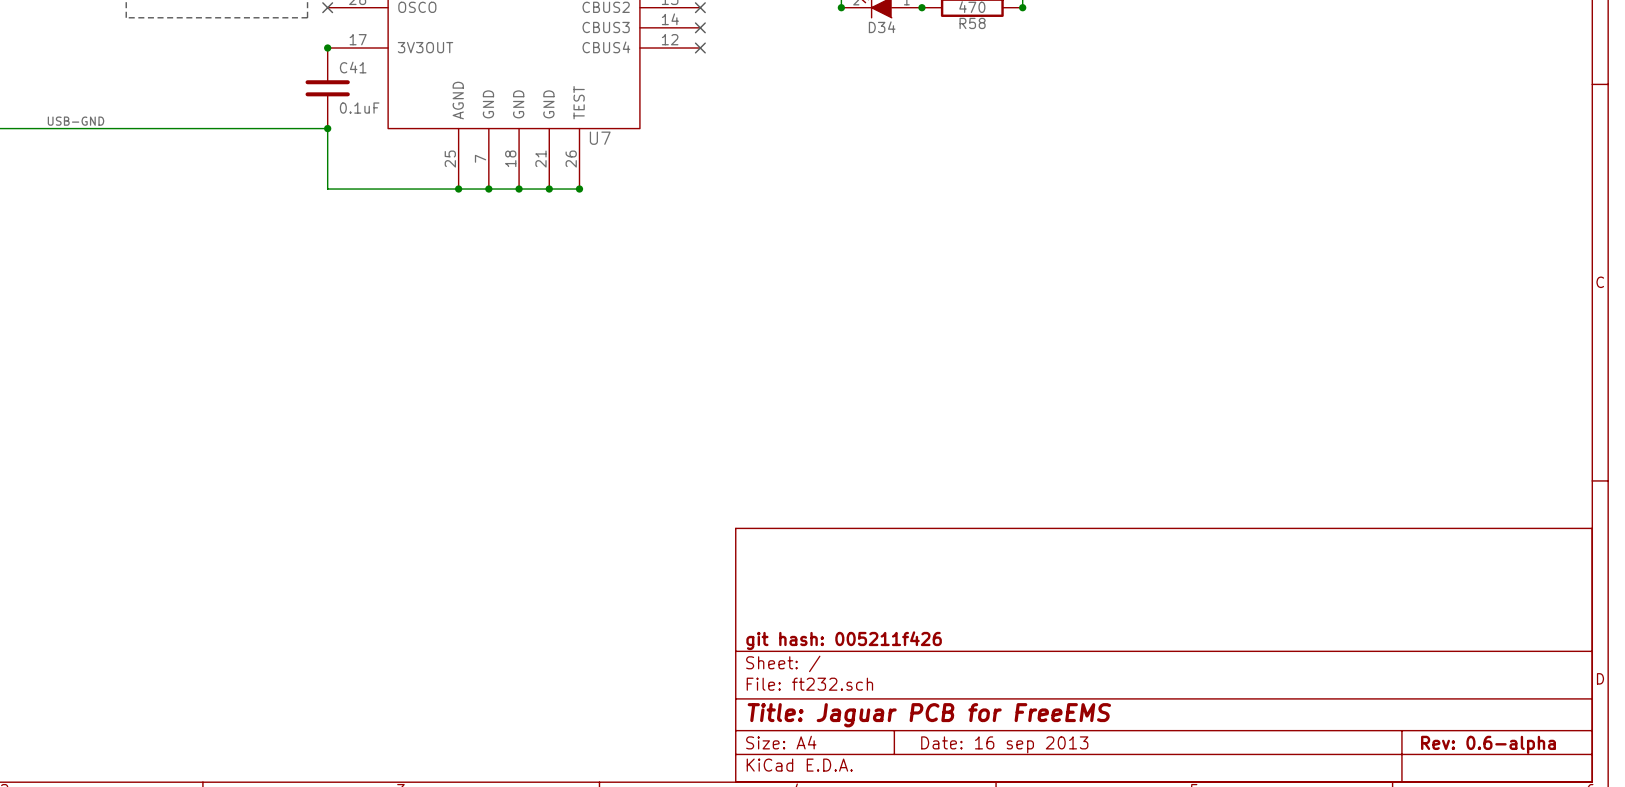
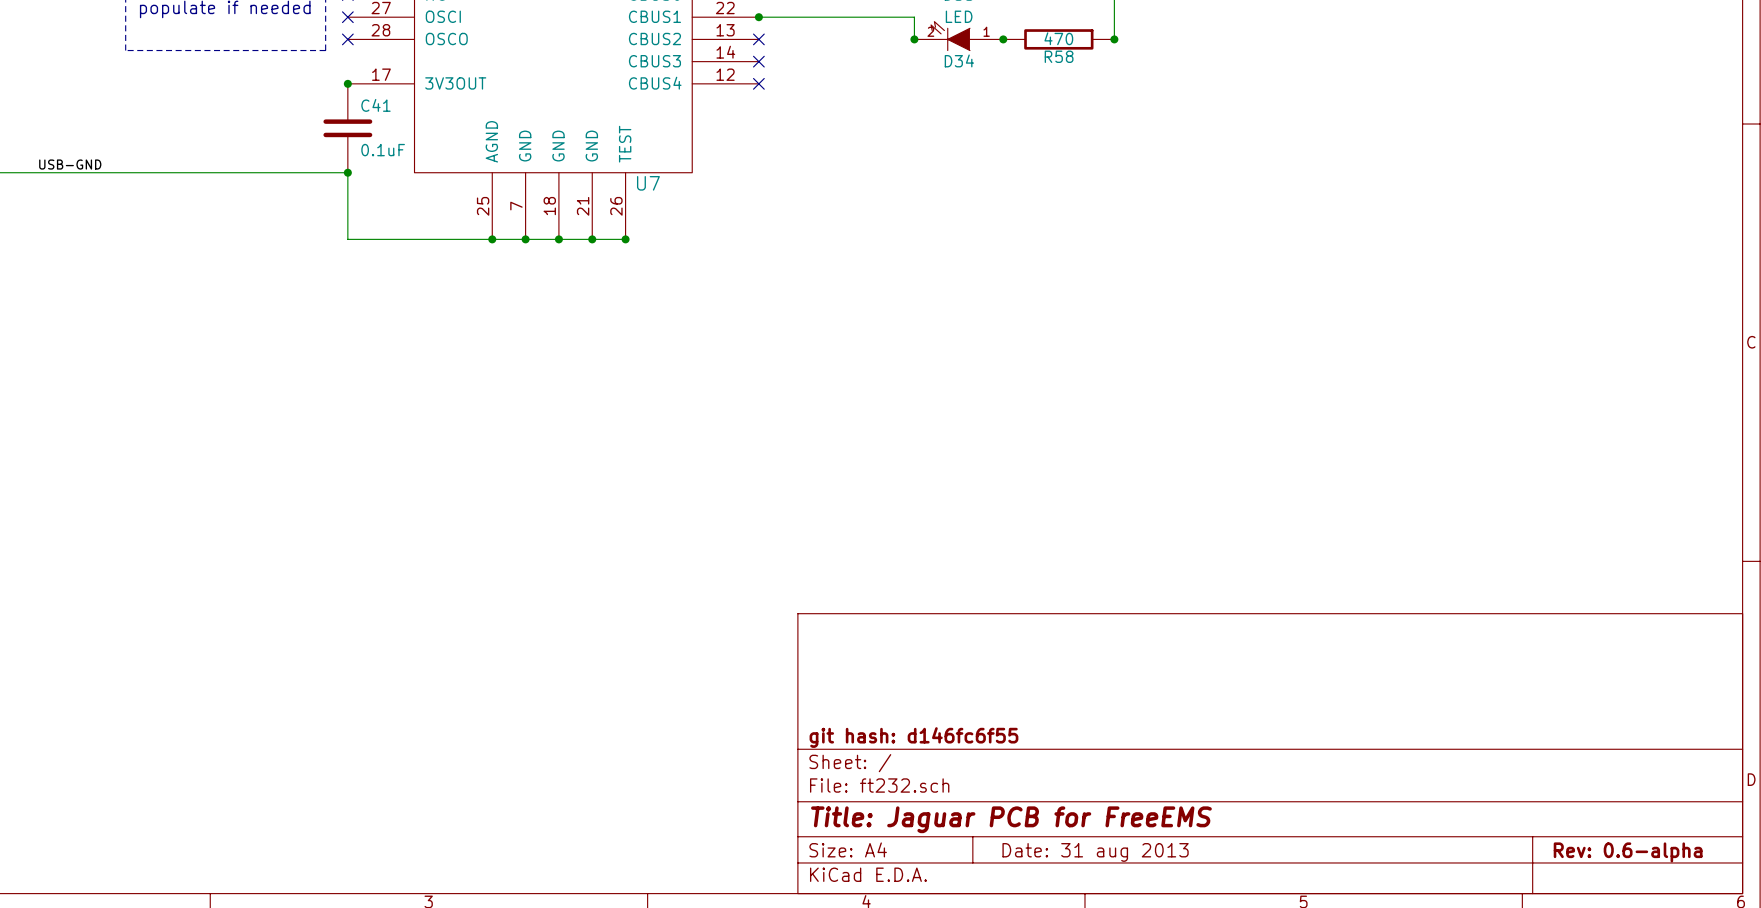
title block: git hash: 005211f426 (844, 640) -> git hash: d146fc6f55 (913, 737)
title block: Date: 16 sep 2013 (1004, 744) -> Date: 31 aug 2013 (1095, 852)

